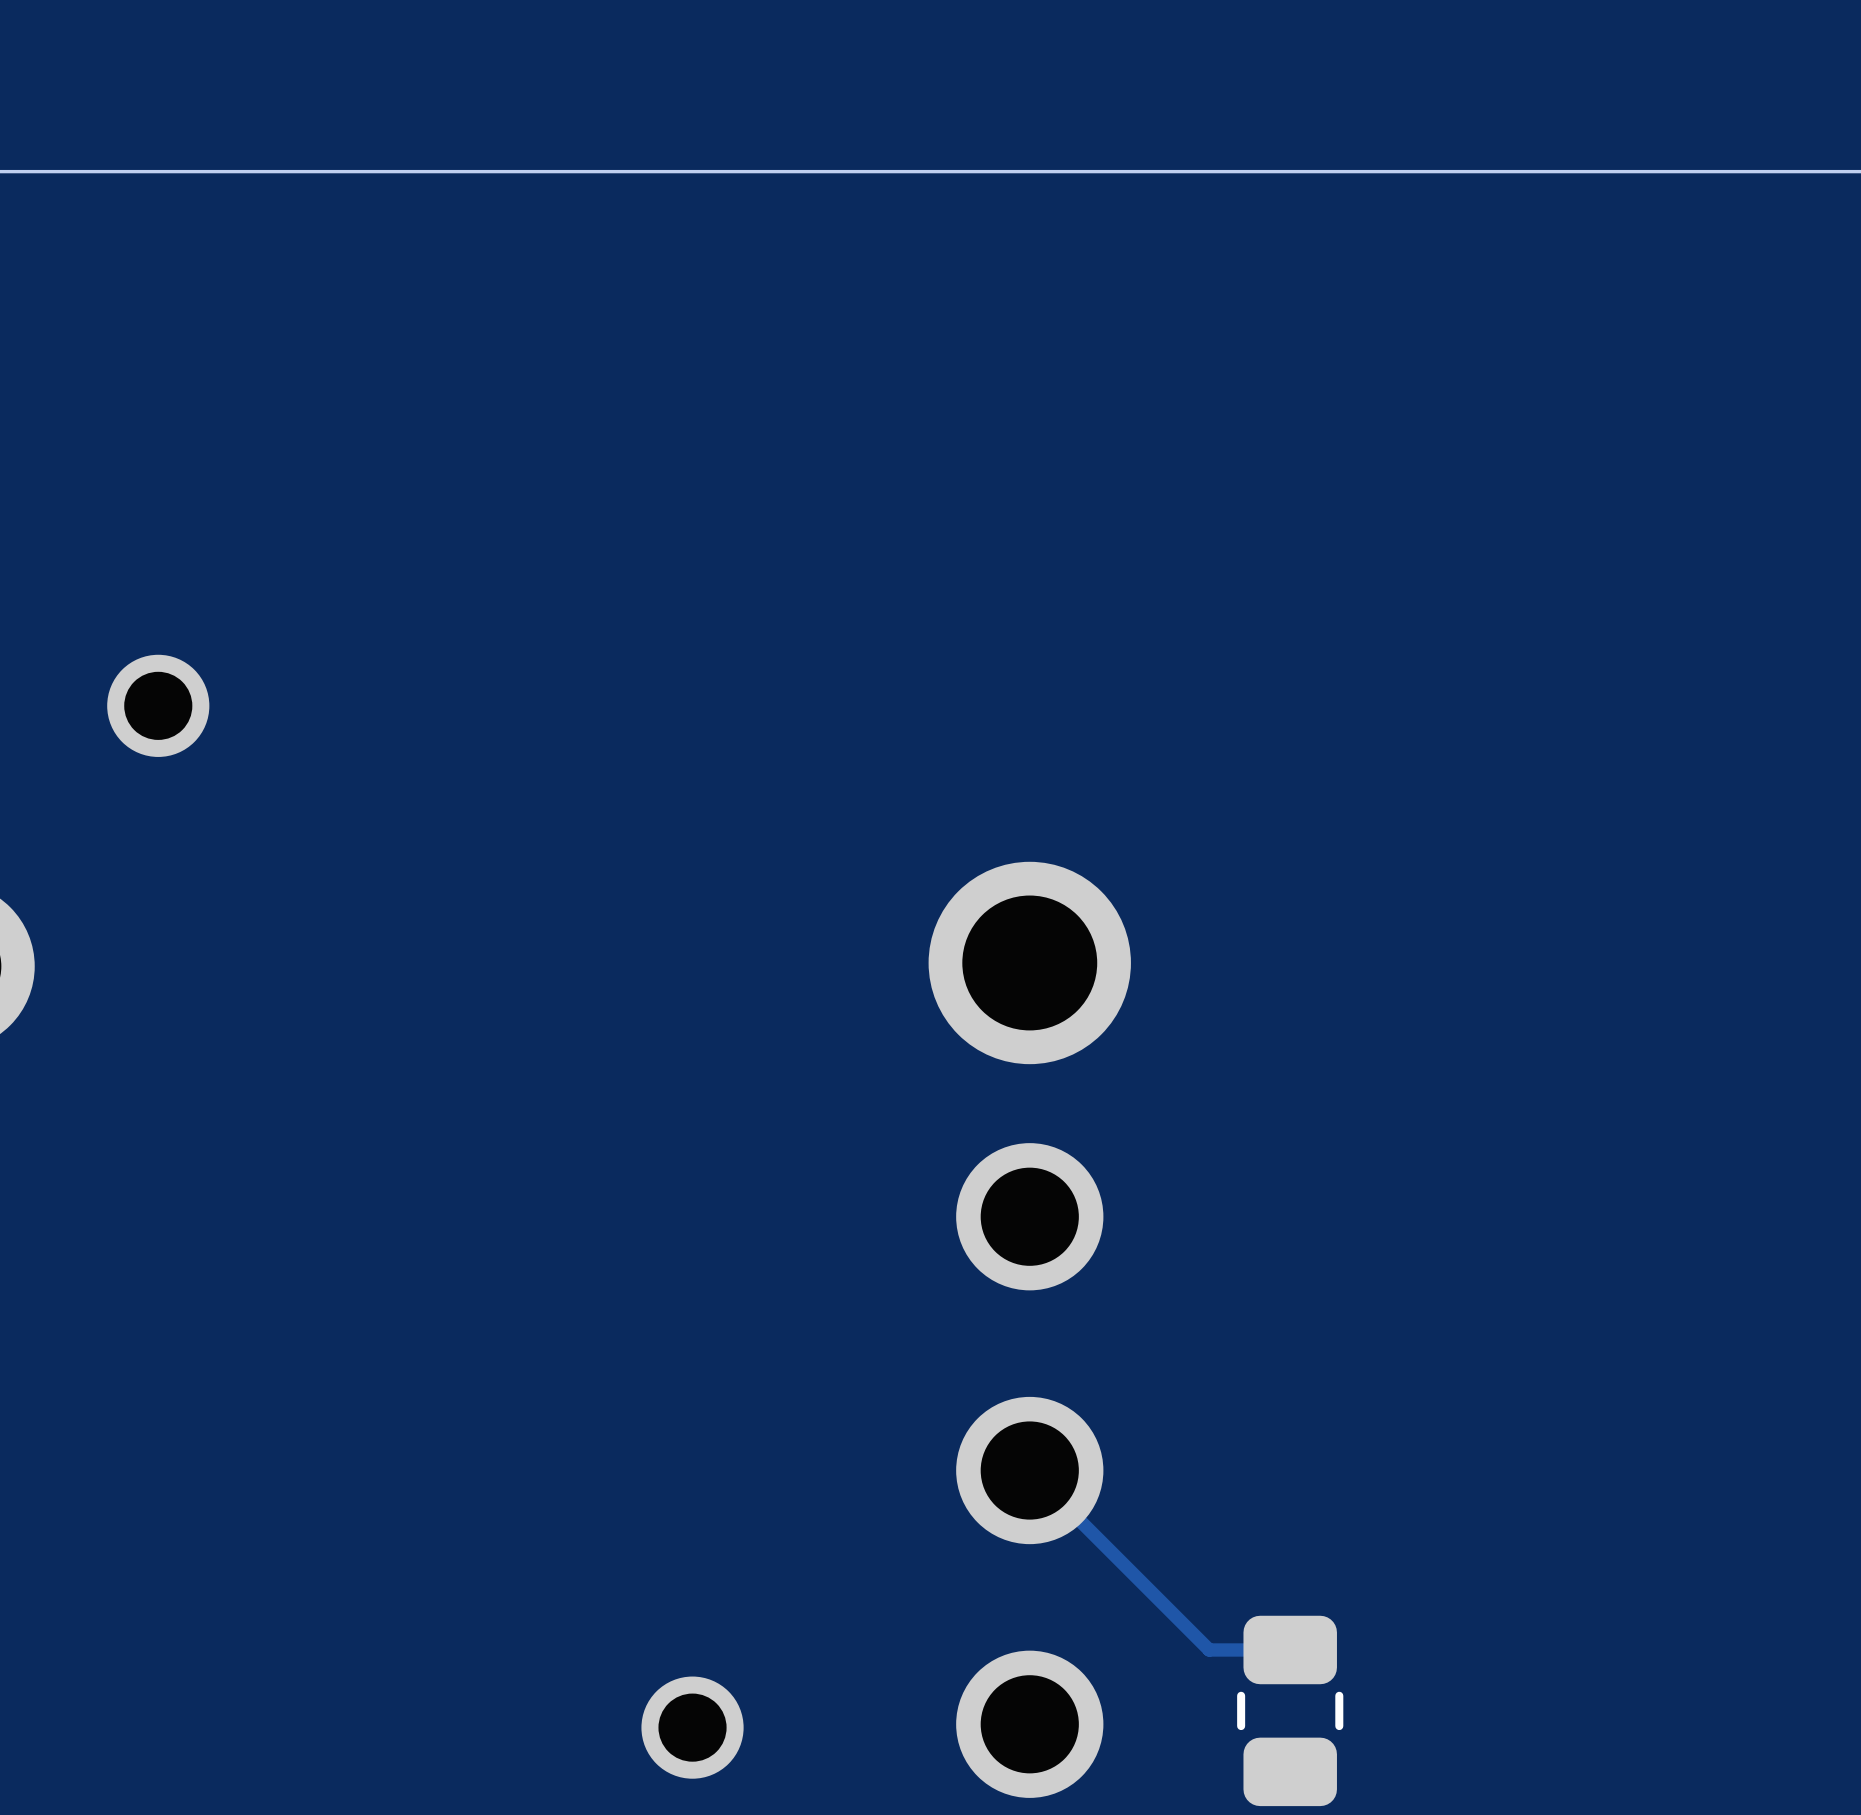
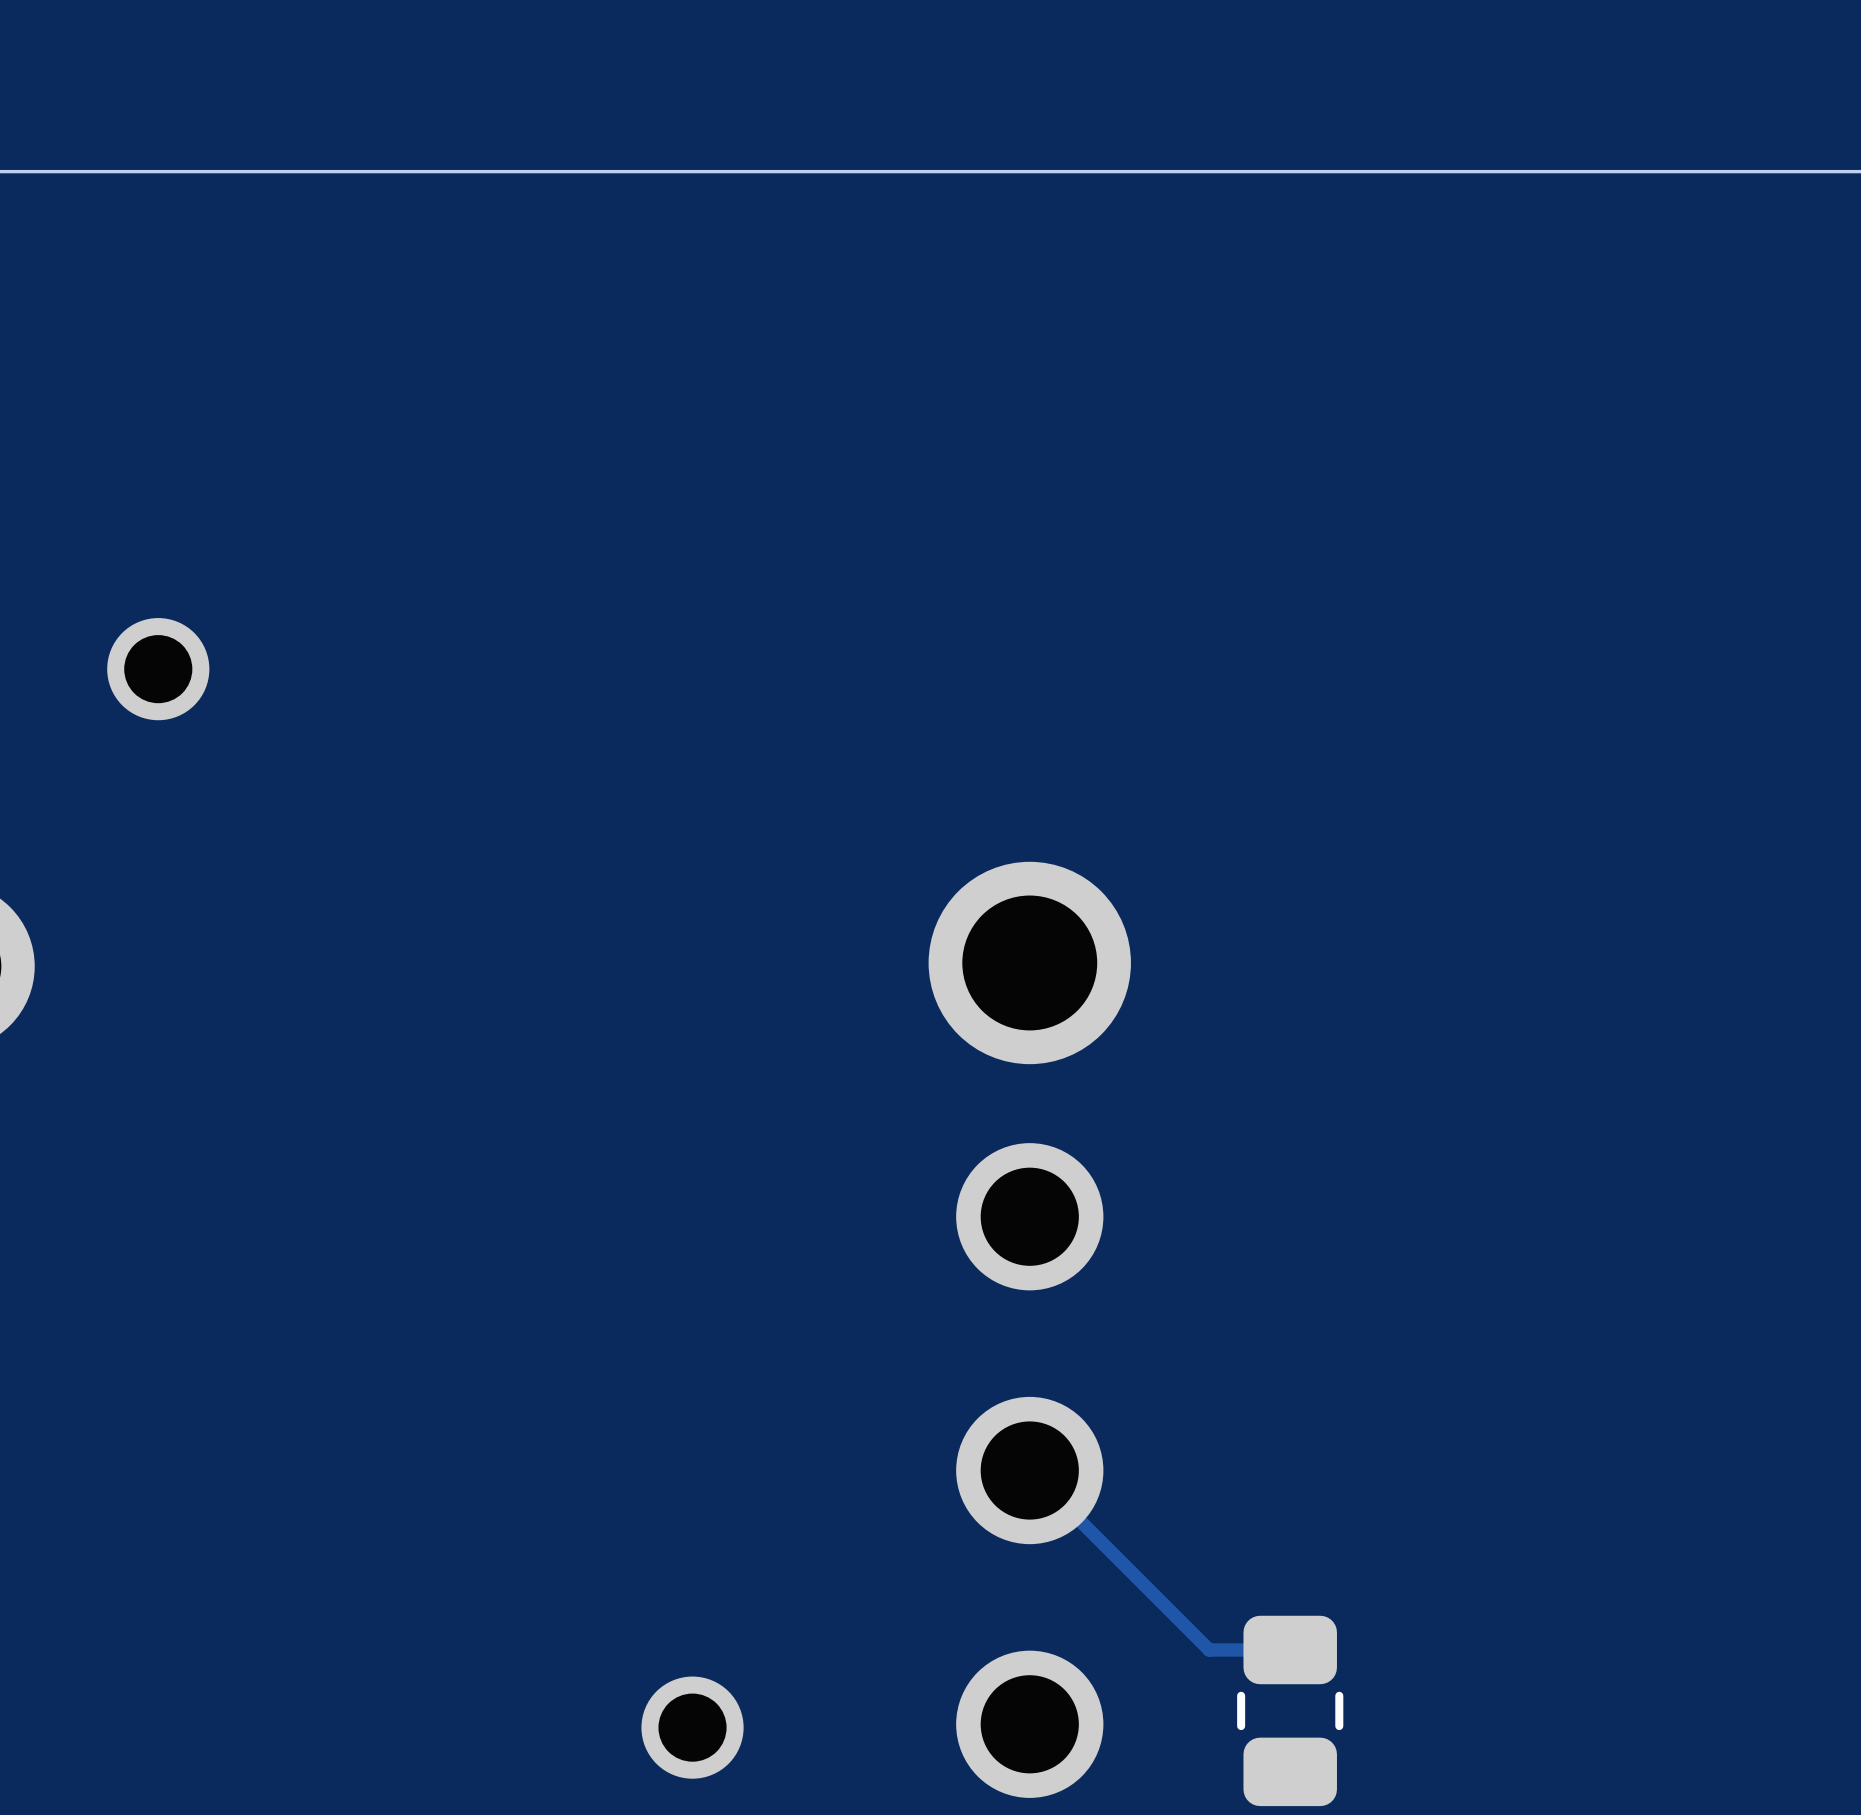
part position: (158, 705) -> (158, 669)

